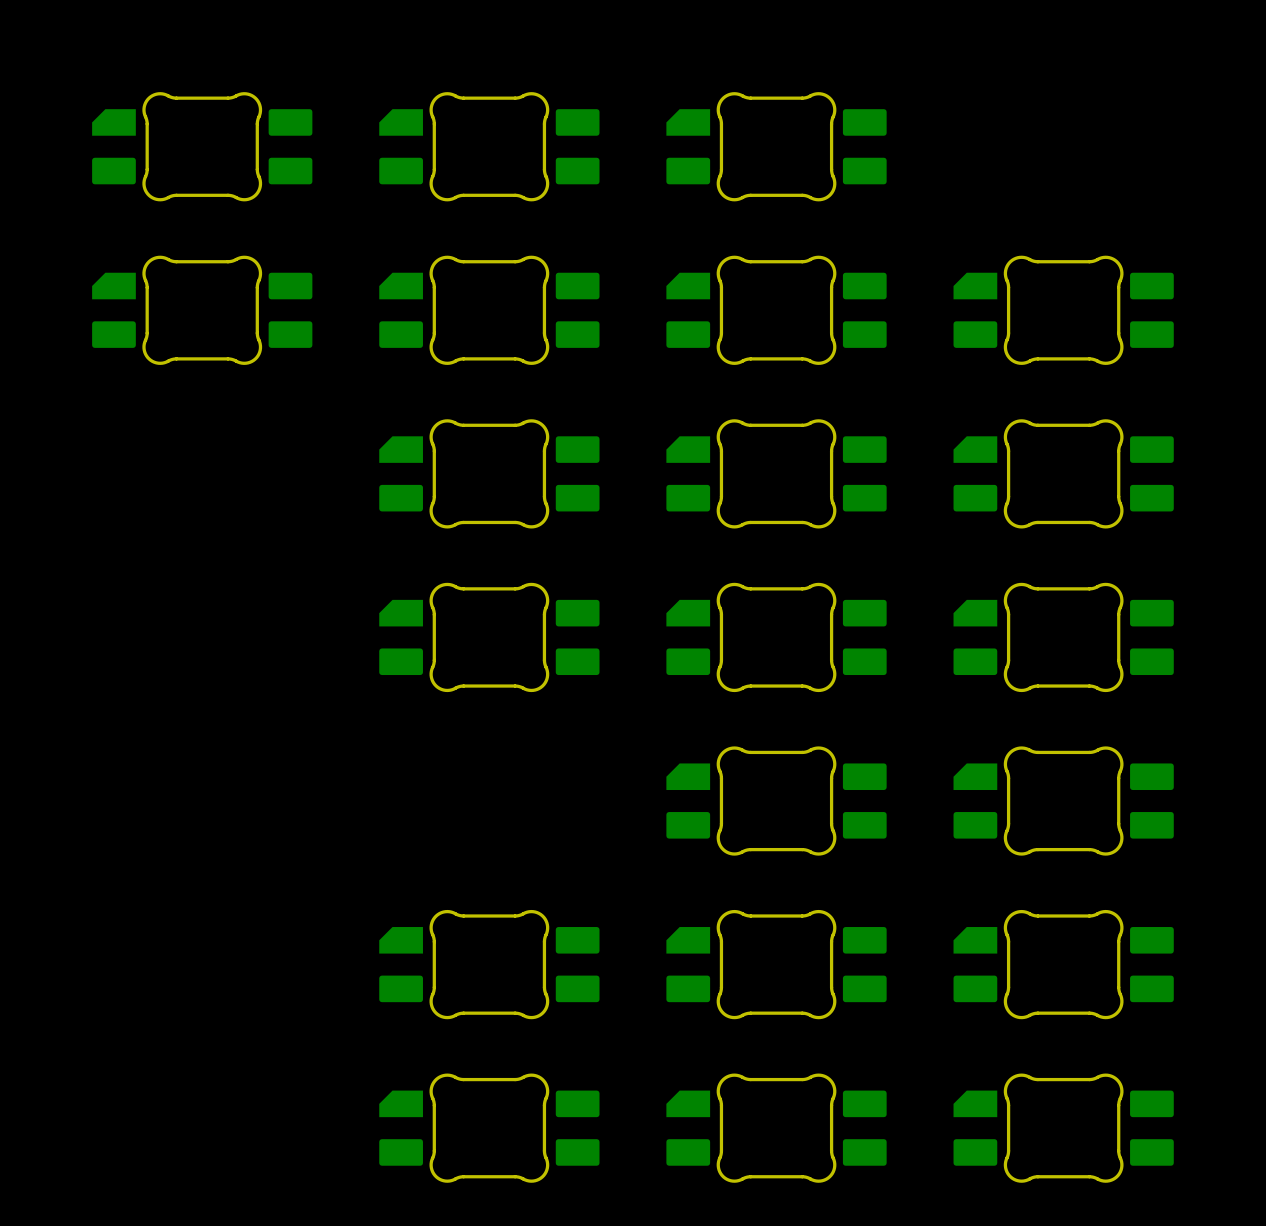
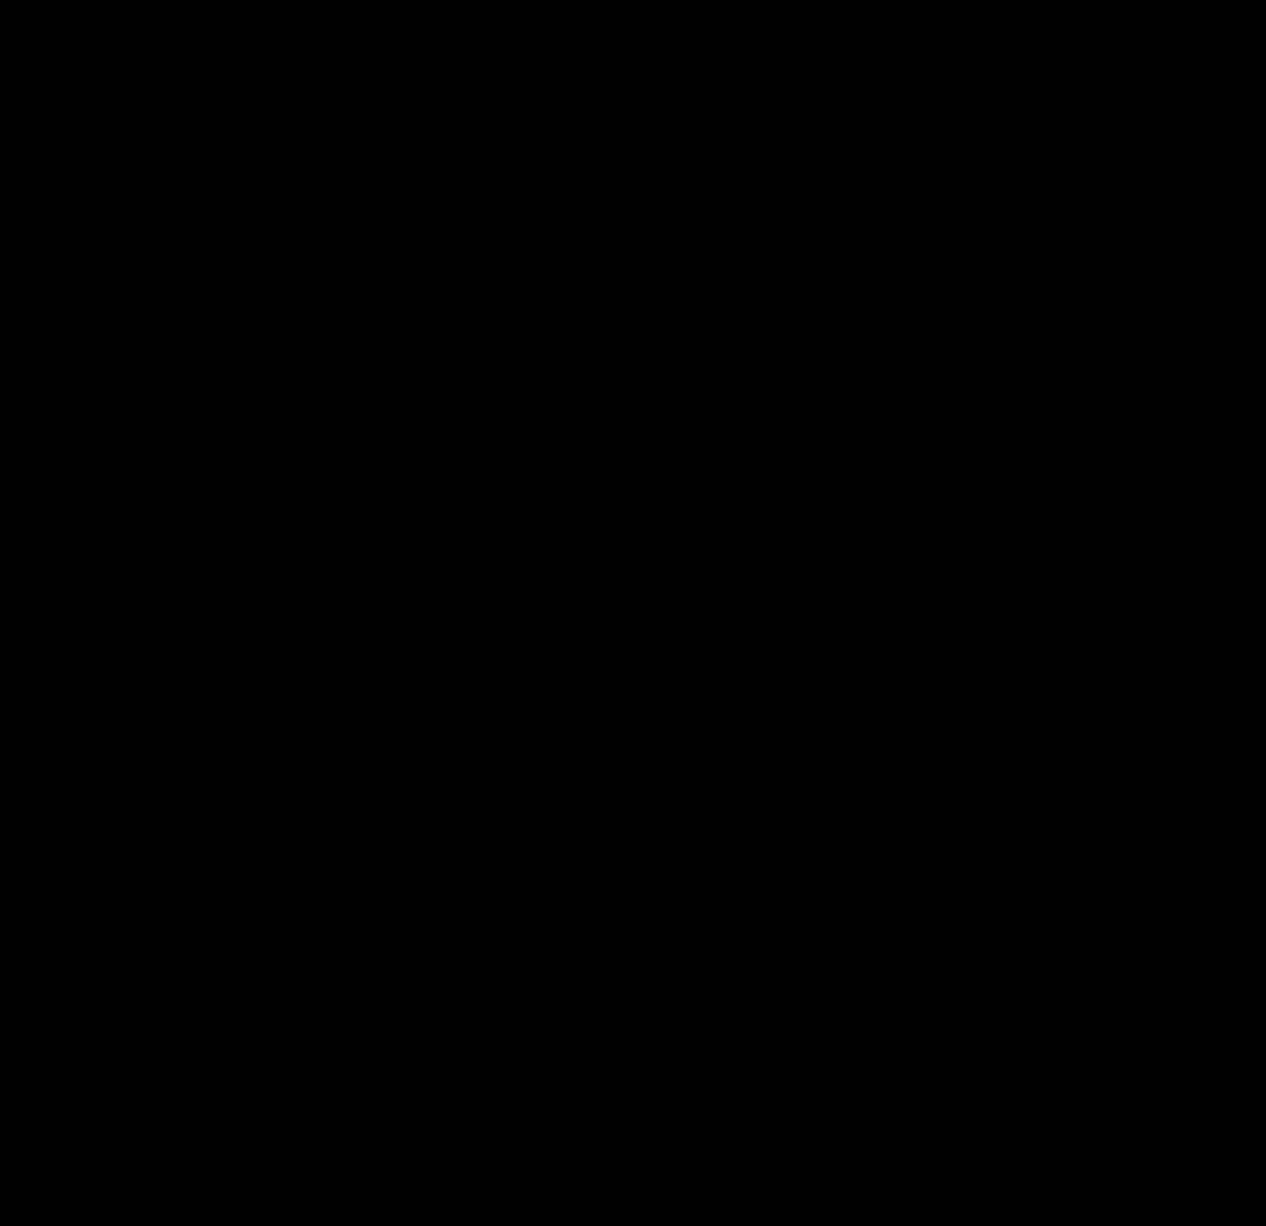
part: (202, 146) -> none
part: (489, 146) -> none
part: (776, 146) -> none
part: (202, 310) -> none
part: (489, 310) -> none
part: (776, 310) -> none
part: (1063, 310) -> none
part: (489, 473) -> none
part: (776, 473) -> none
part: (1063, 473) -> none
part: (489, 637) -> none
part: (776, 637) -> none
part: (1063, 637) -> none
part: (776, 801) -> none
part: (1063, 801) -> none
part: (489, 964) -> none
part: (776, 964) -> none
part: (1063, 964) -> none
part: (489, 1128) -> none
part: (776, 1128) -> none
part: (1063, 1128) -> none

